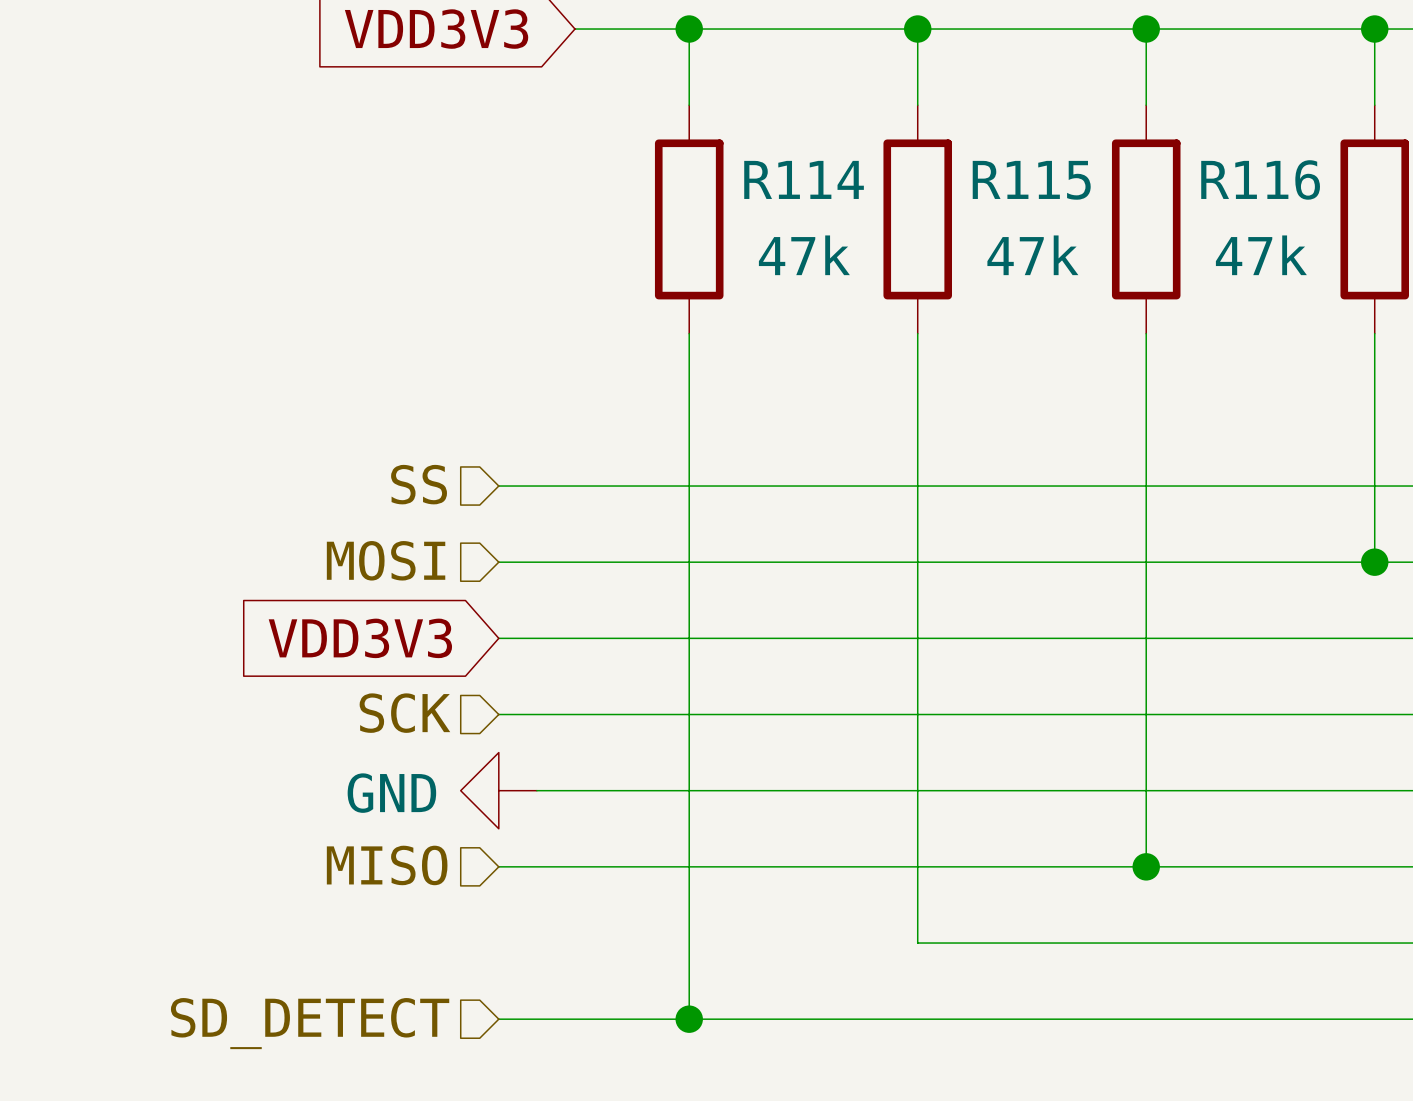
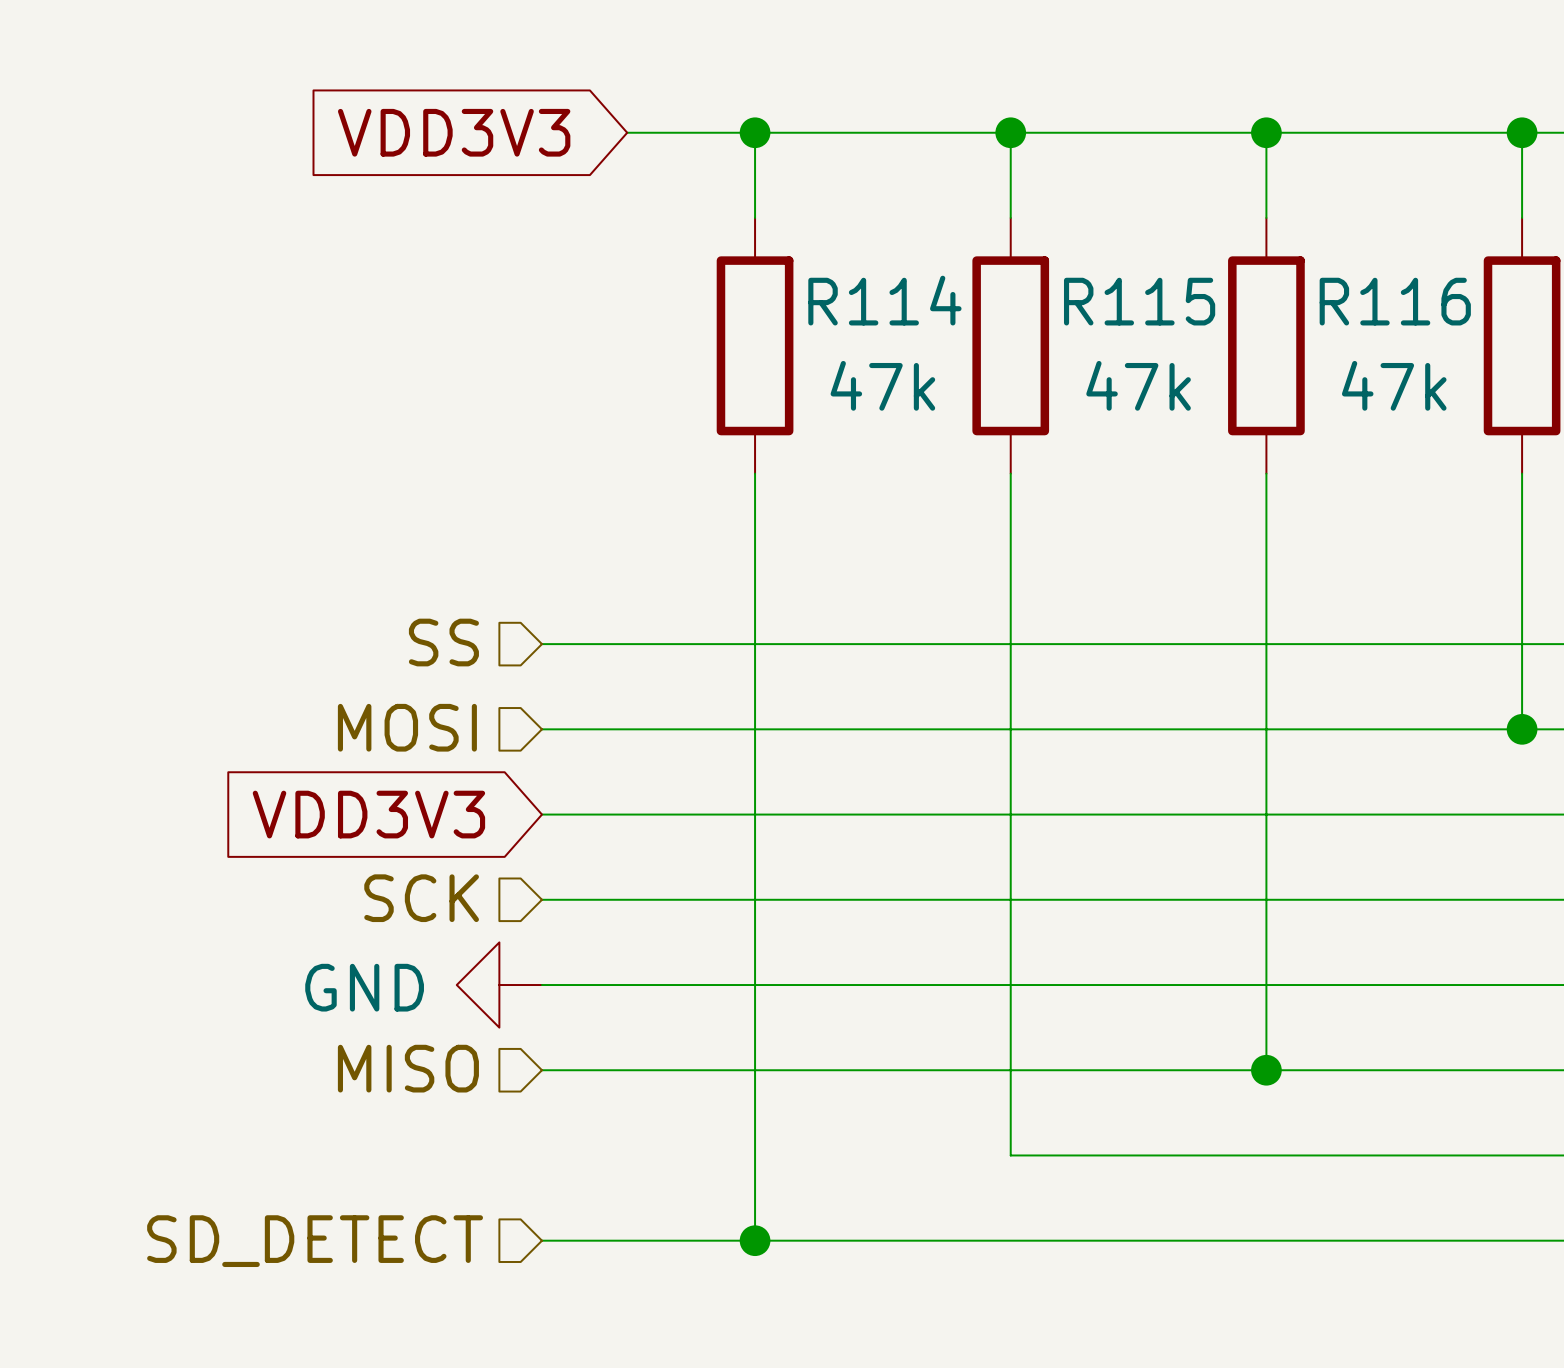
power symbol position: GND (498, 790) -> GND (499, 985)

